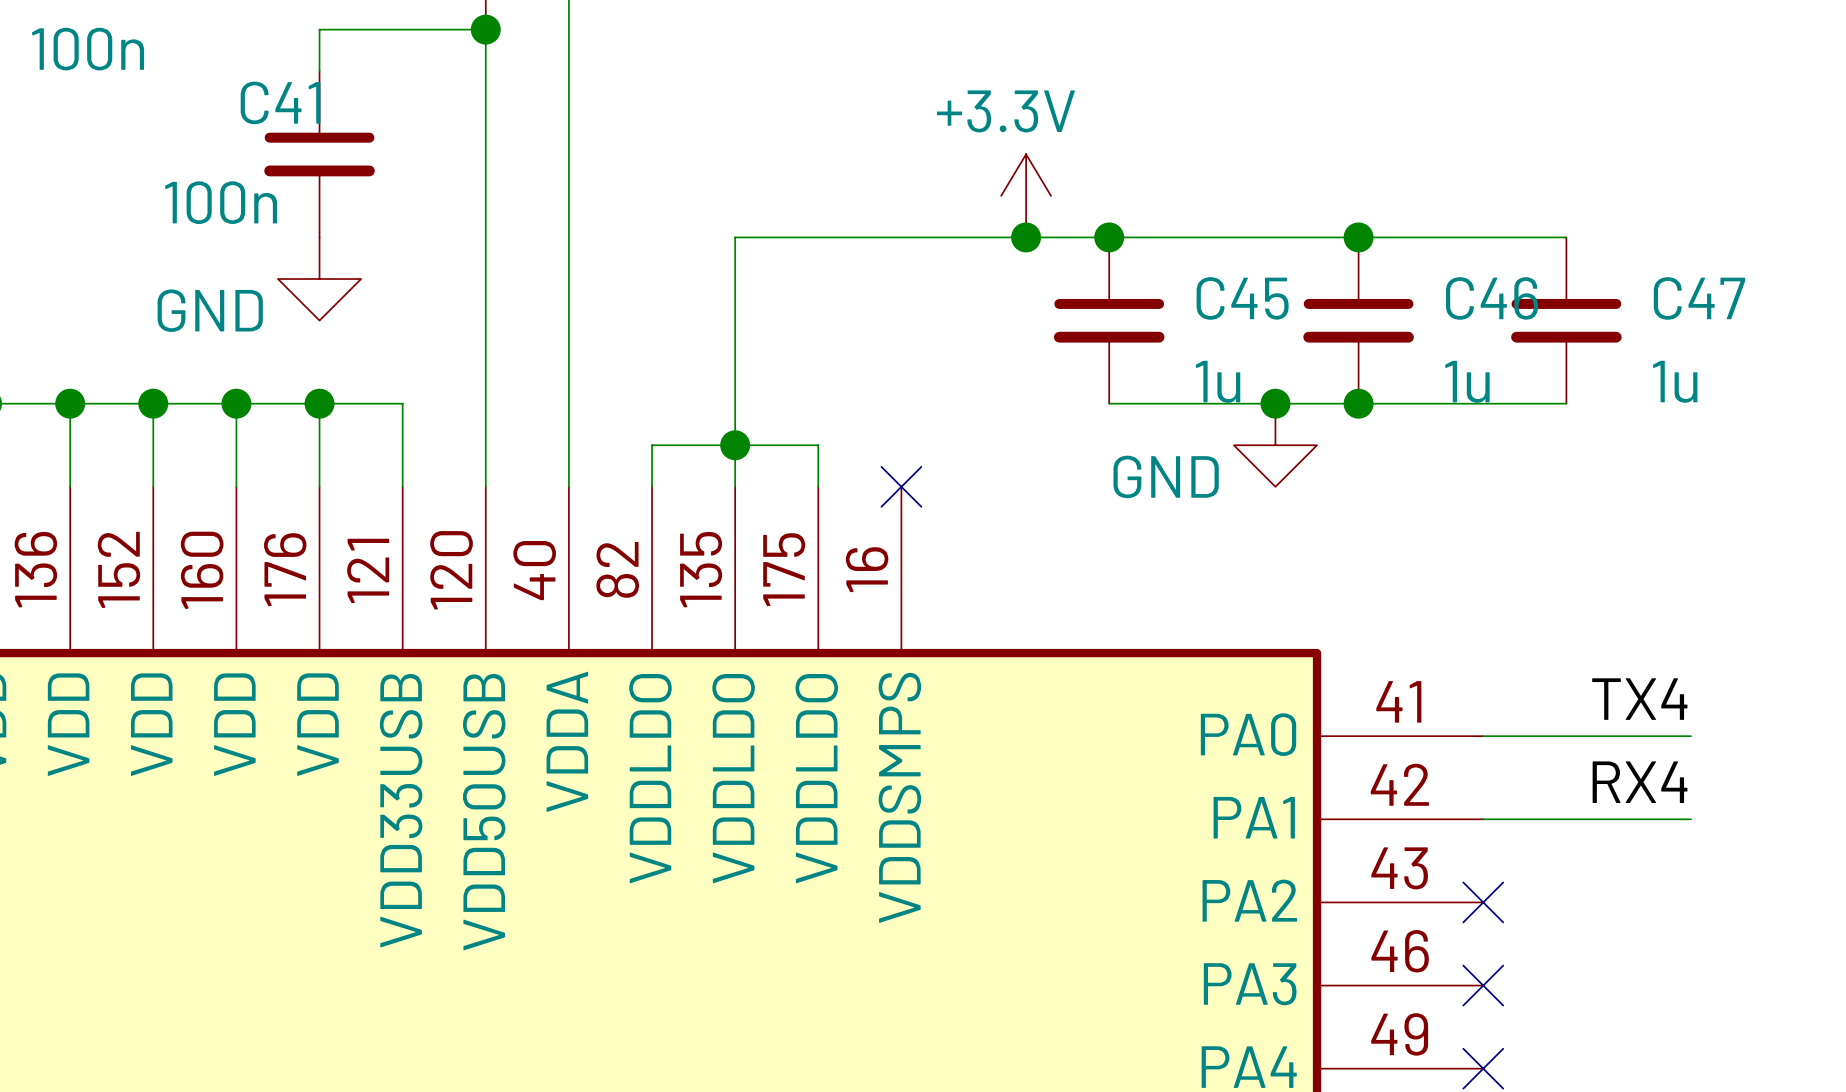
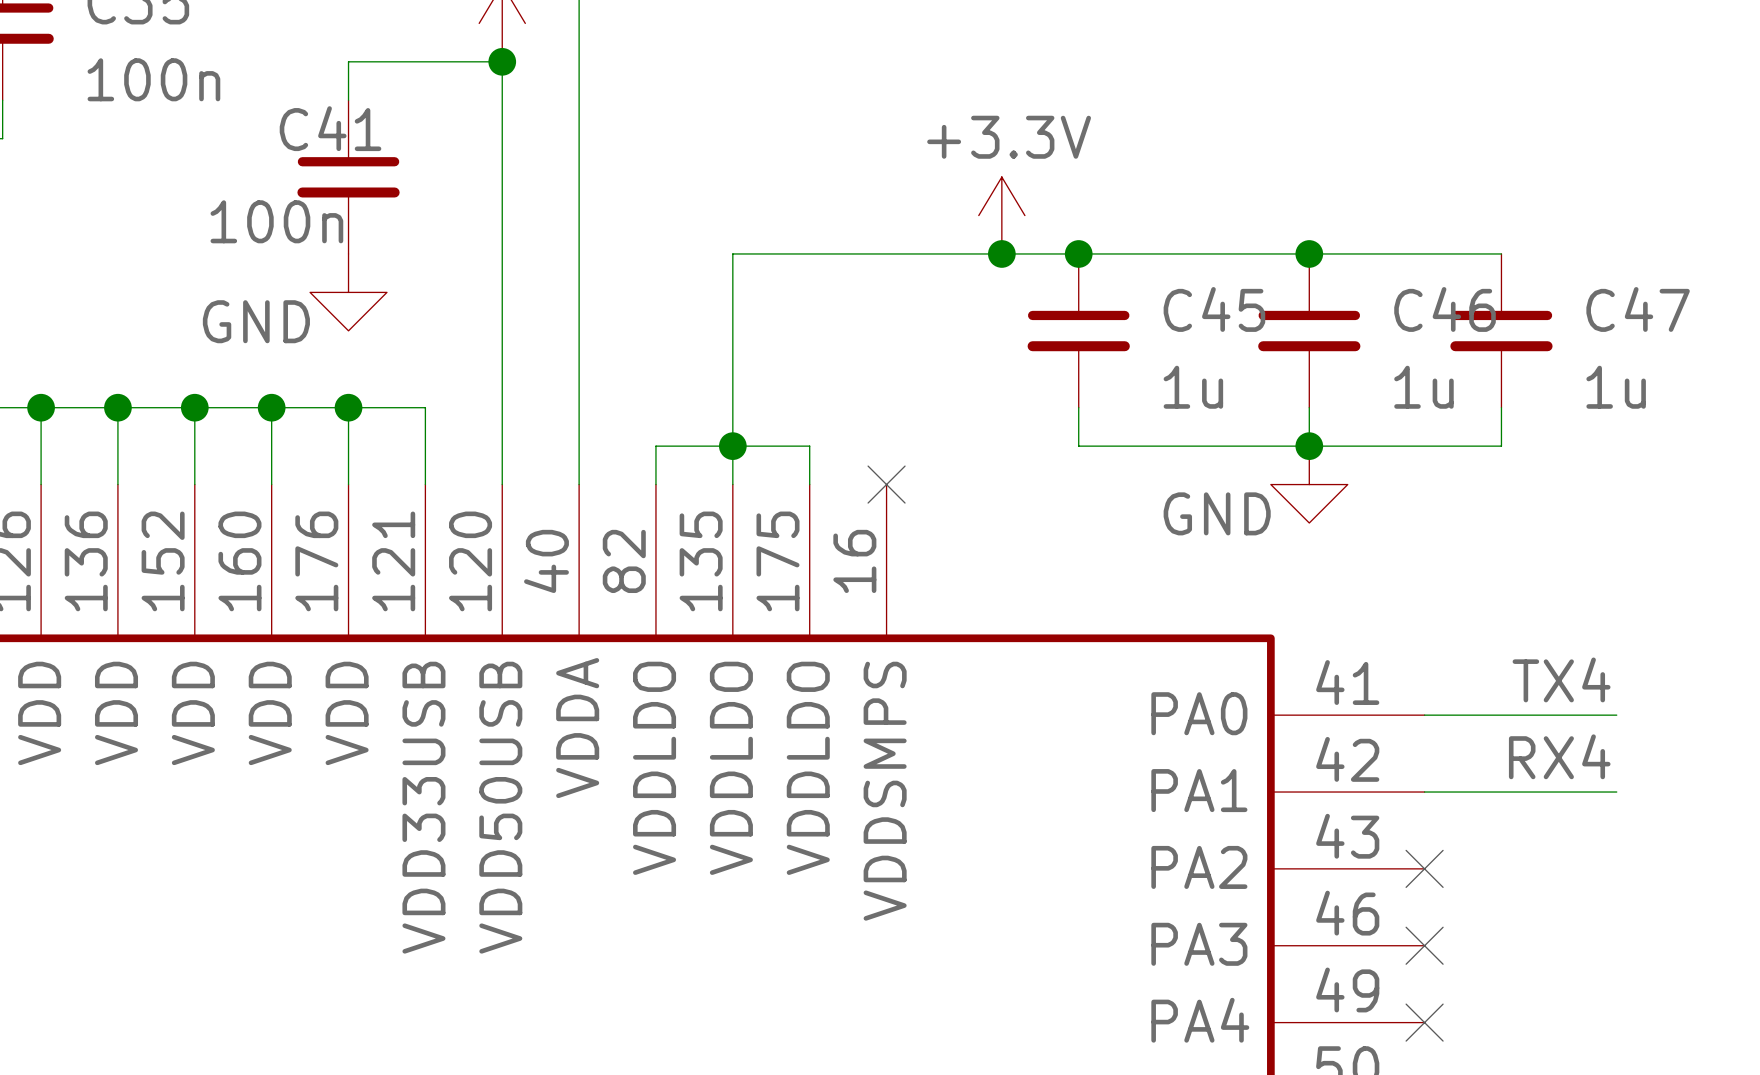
wire: (1109, 403) (1566, 403) -> (1078, 407) (1078, 446) (1501, 446) (1501, 407)
junction: (1275, 403) -> none
wire: none -> (1309, 407) (1309, 446)
junction position: (1358, 403) -> (1309, 446)
power symbol position: GND (1275, 445) -> GND (1309, 484)

